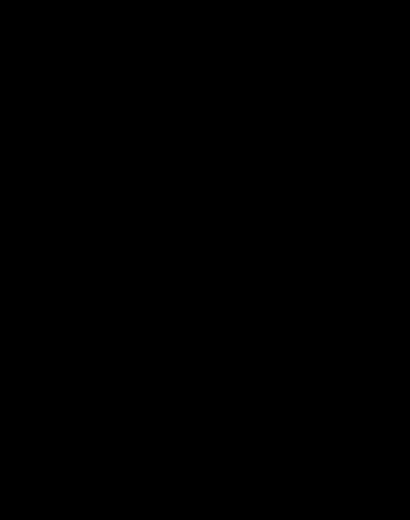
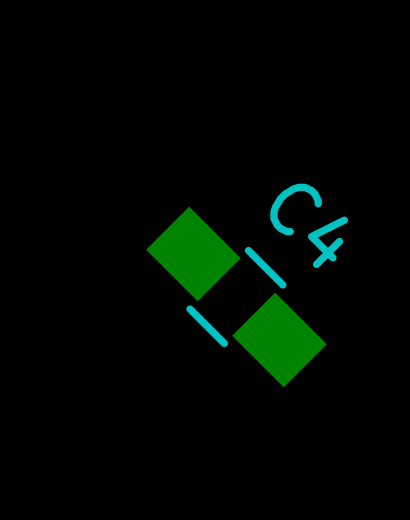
C4: none -> (236, 297)

